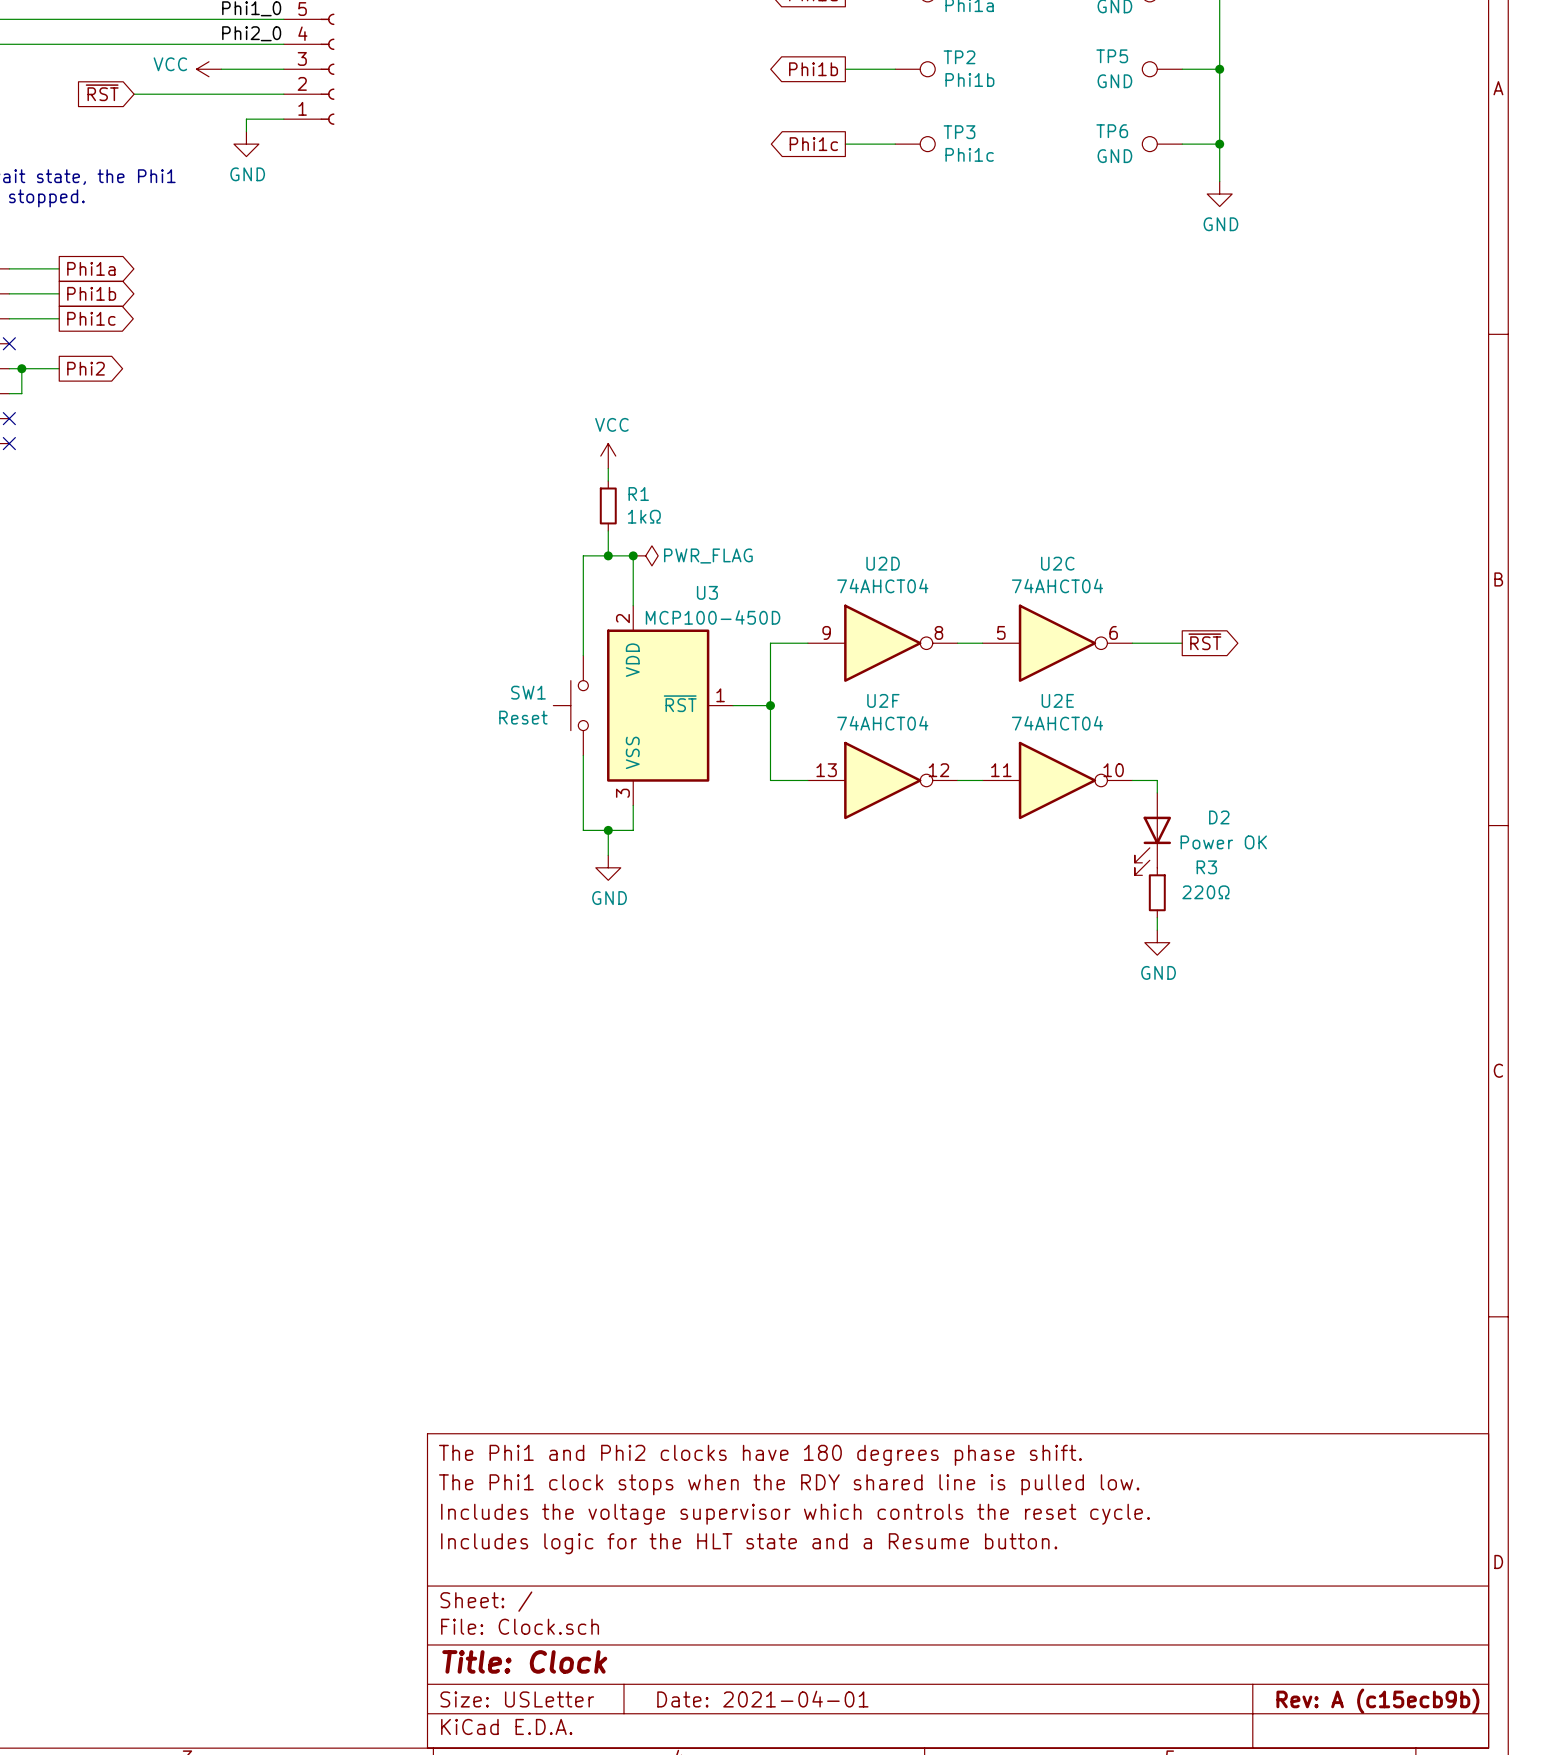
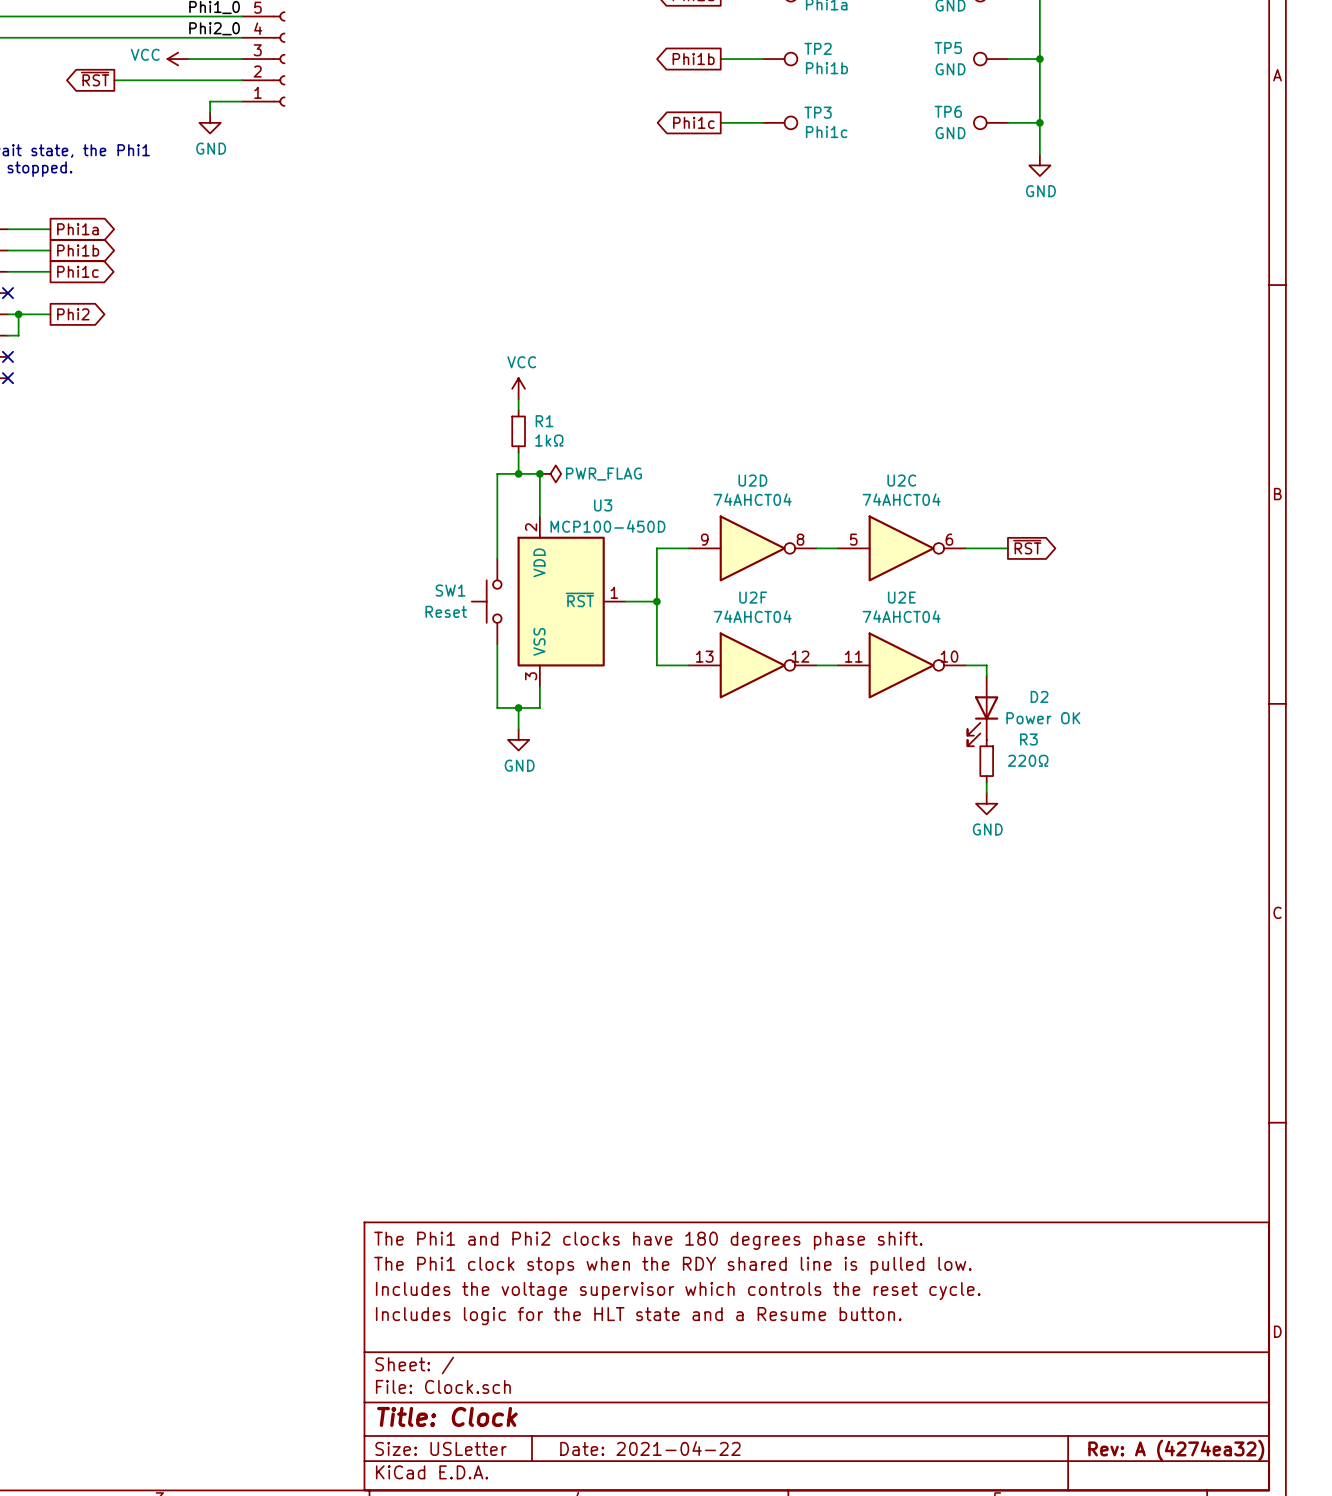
global label shape: input (102, 92) -> output (95, 79)
title block: Date: 2021-04-01 (762, 1699) -> Date: 2021-04-22 (650, 1448)
title block: Rev: A (c15ecb9b) (1377, 1701) -> Rev: A (4274ea32) (1176, 1450)

